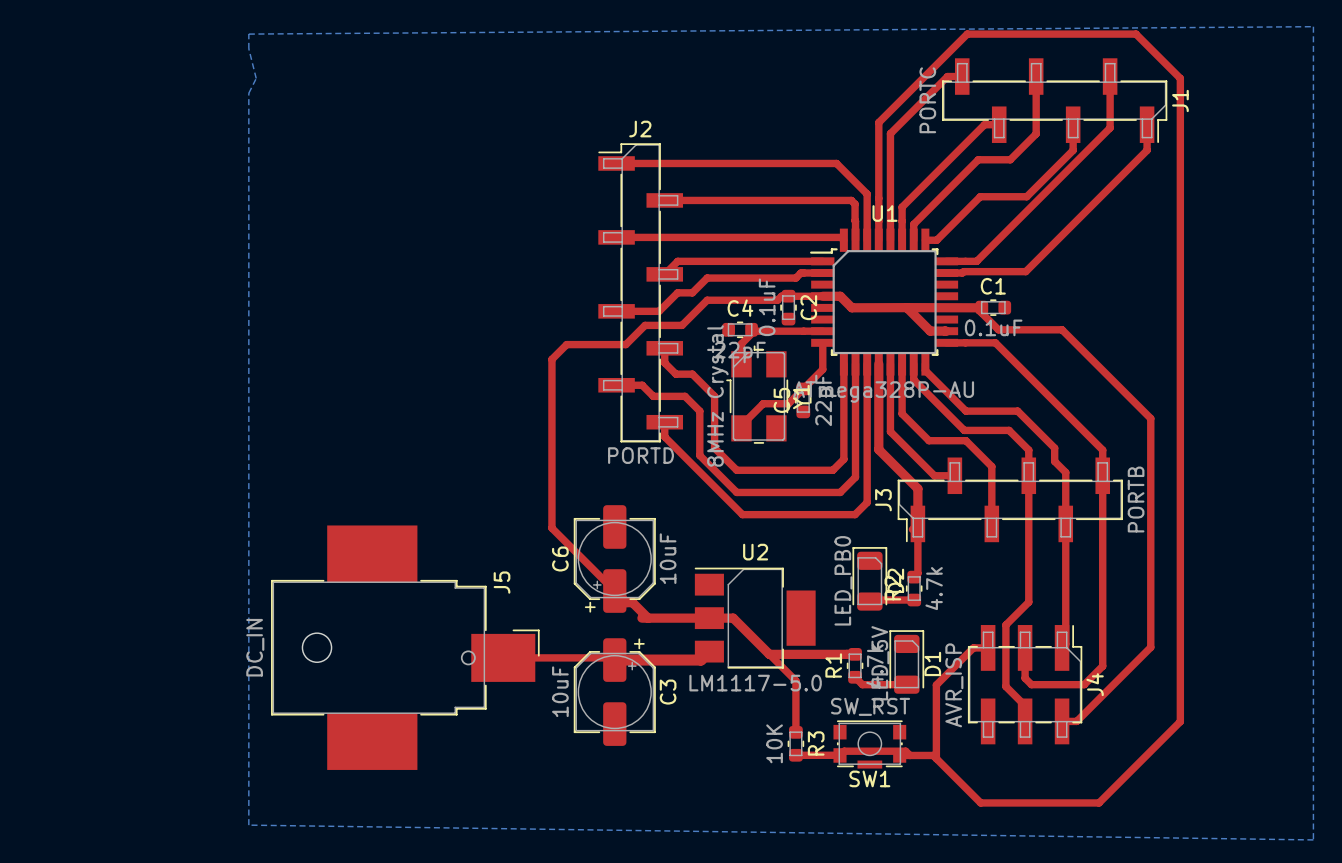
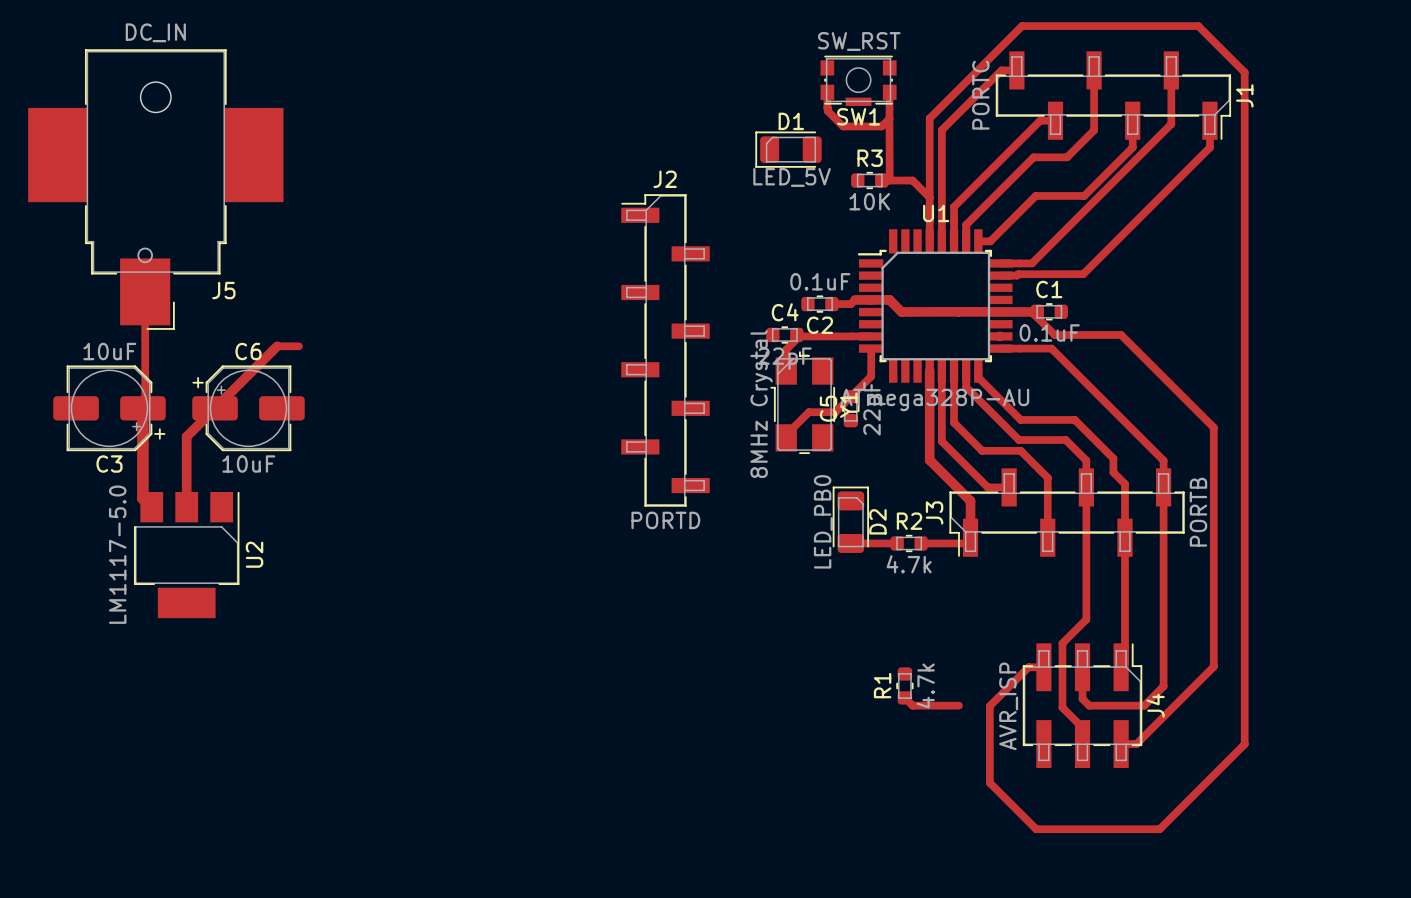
bottom zone outline: (1313, 26) (248, 34) (248, 48) (256, 78) (248, 93) (248, 825) (1313, 839) (1313, 26) -> none
top track: none -> (827, 92) (827, 111) (843, 126) (881, 126) (889, 118)
top track: none -> (889, 92) (889, 118)
top track: none -> (889, 118) (888, 180)
top track: (616, 163) (836, 163) (867, 194) (867, 240) -> none
top track: none -> (881, 180) (912, 180) (929, 197)
top track: (664, 200) (851, 200) (855, 204) (855, 240) -> none
top track: (616, 237) (841, 237) (843, 240) -> none
top track: (822, 261) (677, 261) (664, 274) -> none
top track: (822, 272) (800, 272) (795, 278) (707, 278) (692, 292) (677, 292) (659, 311) (616, 311) -> none
top track: none -> (145, 291) (145, 417)
J2 position: (640, 292) -> (665, 350)
top track: (822, 296) (781, 296) (777, 300) (707, 300) (682, 325) (645, 325) (625, 344) (566, 344) (551, 359) (551, 528) (626, 602) (632, 602) (648, 618) -> (871, 299) (854, 299) (850, 304) (831, 304)
C2 rotation: 0° (788, 307) -> 90° clockwise (819, 304)
top track: (906, 307) (930, 331) (945, 331) -> none
top track: none -> (298, 346) (277, 346) (186, 436) (186, 507)
top track: (664, 348) (664, 362) (675, 374) (692, 374) (714, 396) (714, 448) (736, 470) (832, 470) (843, 459) (843, 363) -> none
top track: (855, 363) (855, 477) (840, 492) (736, 492) (699, 455) (699, 411) (685, 396) (653, 396) (642, 385) (616, 385) -> none
top track: (867, 363) (867, 502) (855, 514) (742, 514) (664, 436) (664, 422) -> none
top track: none -> (142, 408) (142, 498) (151, 507)
top track: (917, 523) (917, 573) (914, 577) -> none
top track: none -> (850, 543) (897, 543)
top track: none -> (921, 543) (964, 543)
C6 rotation: 0° (614, 558) -> 90° clockwise (248, 408)
C6 position: (614, 558) -> (248, 408)
D2 position: (869, 578) -> (850, 519)
R2 rotation: 0° (914, 588) -> 90° clockwise (909, 543)
R2 position: (914, 588) -> (909, 543)
top track: (914, 600) (869, 601) -> none
top track: (641, 618) (733, 618) (769, 654) -> none
U2 rotation: 0° (755, 618) -> 90° clockwise (186, 554)
U2 position: (755, 618) -> (186, 554)
J5 rotation: 0° (405, 647) -> 90° clockwise (155, 189)
J5 position: (405, 647) -> (155, 189)
top track: (709, 651) (700, 660) (614, 660) -> none
top track: (769, 654) (855, 654) (848, 654) -> none
top track: (769, 654) (795, 680) (795, 732) -> none
top track: (503, 657) (623, 657) -> none
D1 rotation: 0° (906, 661) -> 90° counterclockwise (788, 149)
D1 position: (906, 661) -> (788, 149)
C3 rotation: 0° (614, 692) -> 90° clockwise (109, 408)
C3 position: (614, 692) -> (109, 408)
R3 value position: 10K (774, 743) -> 10K (869, 201)
R3 rotation: 0° (795, 743) -> 90° clockwise (869, 180)
R3 position: (795, 743) -> (869, 180)
R3 name position: R3 (816, 743) -> R3 (870, 158)
SW1 position: (869, 744) -> (858, 80)
top track: (795, 755) (839, 755) -> none
top track: (840, 755) (844, 751) (905, 751) (909, 755) -> none
top track: (899, 755) (933, 755) (936, 758) -> none

